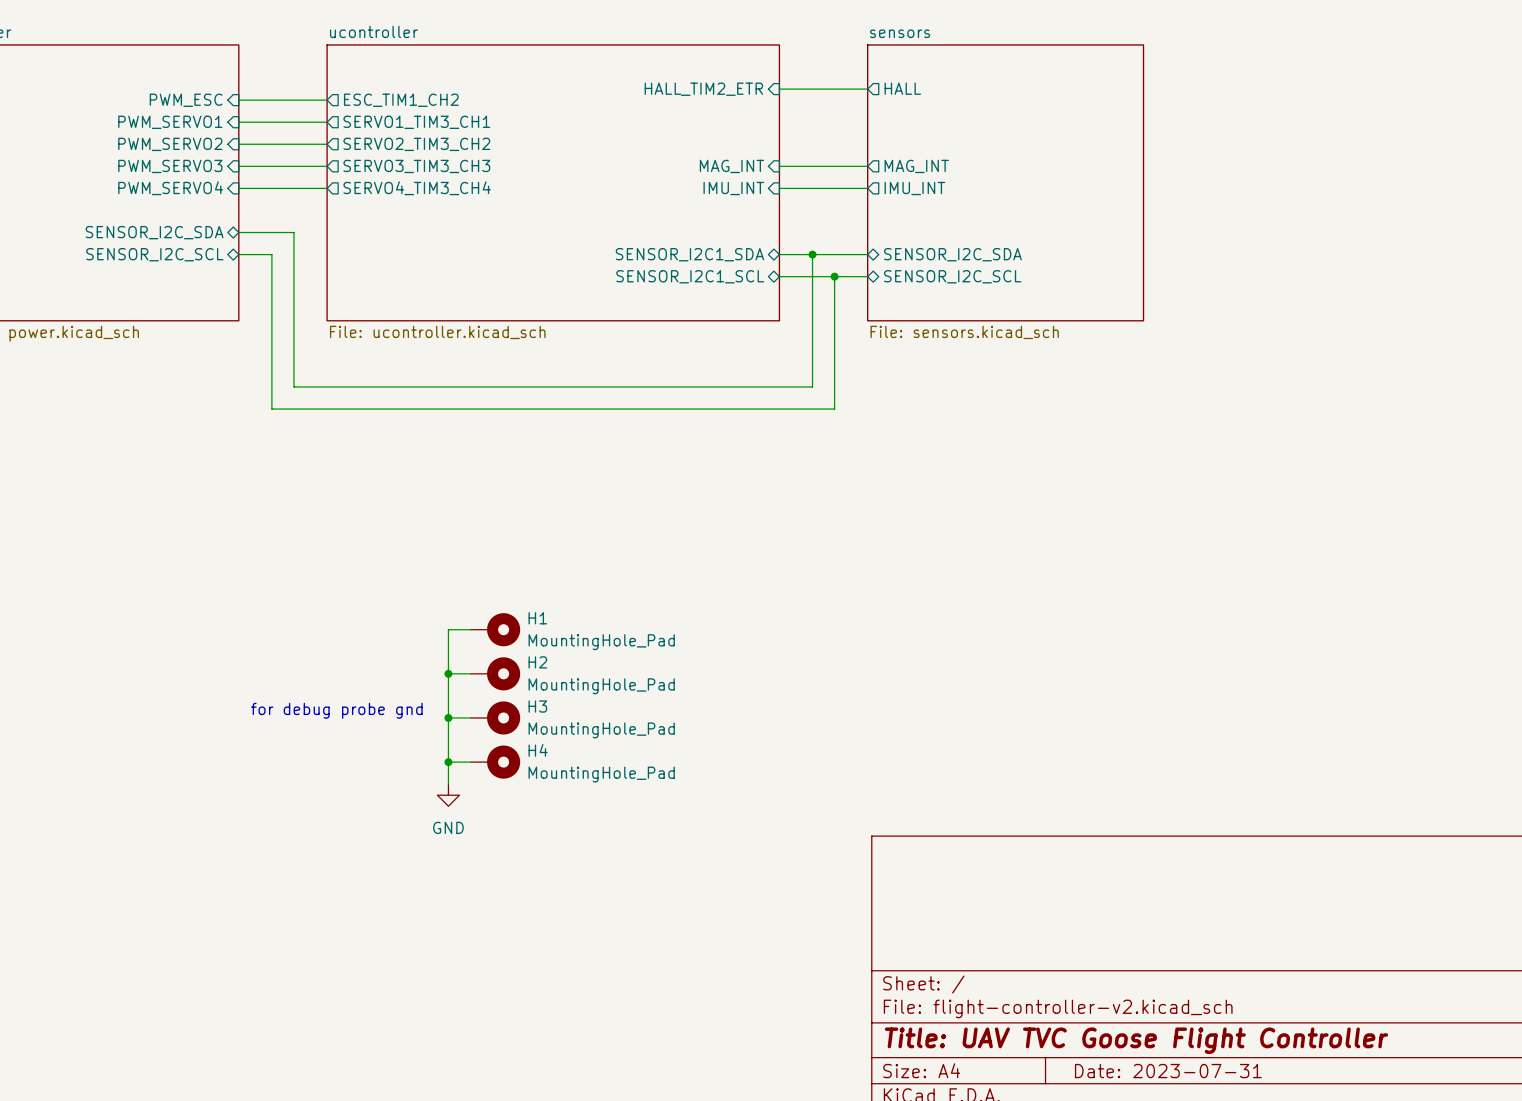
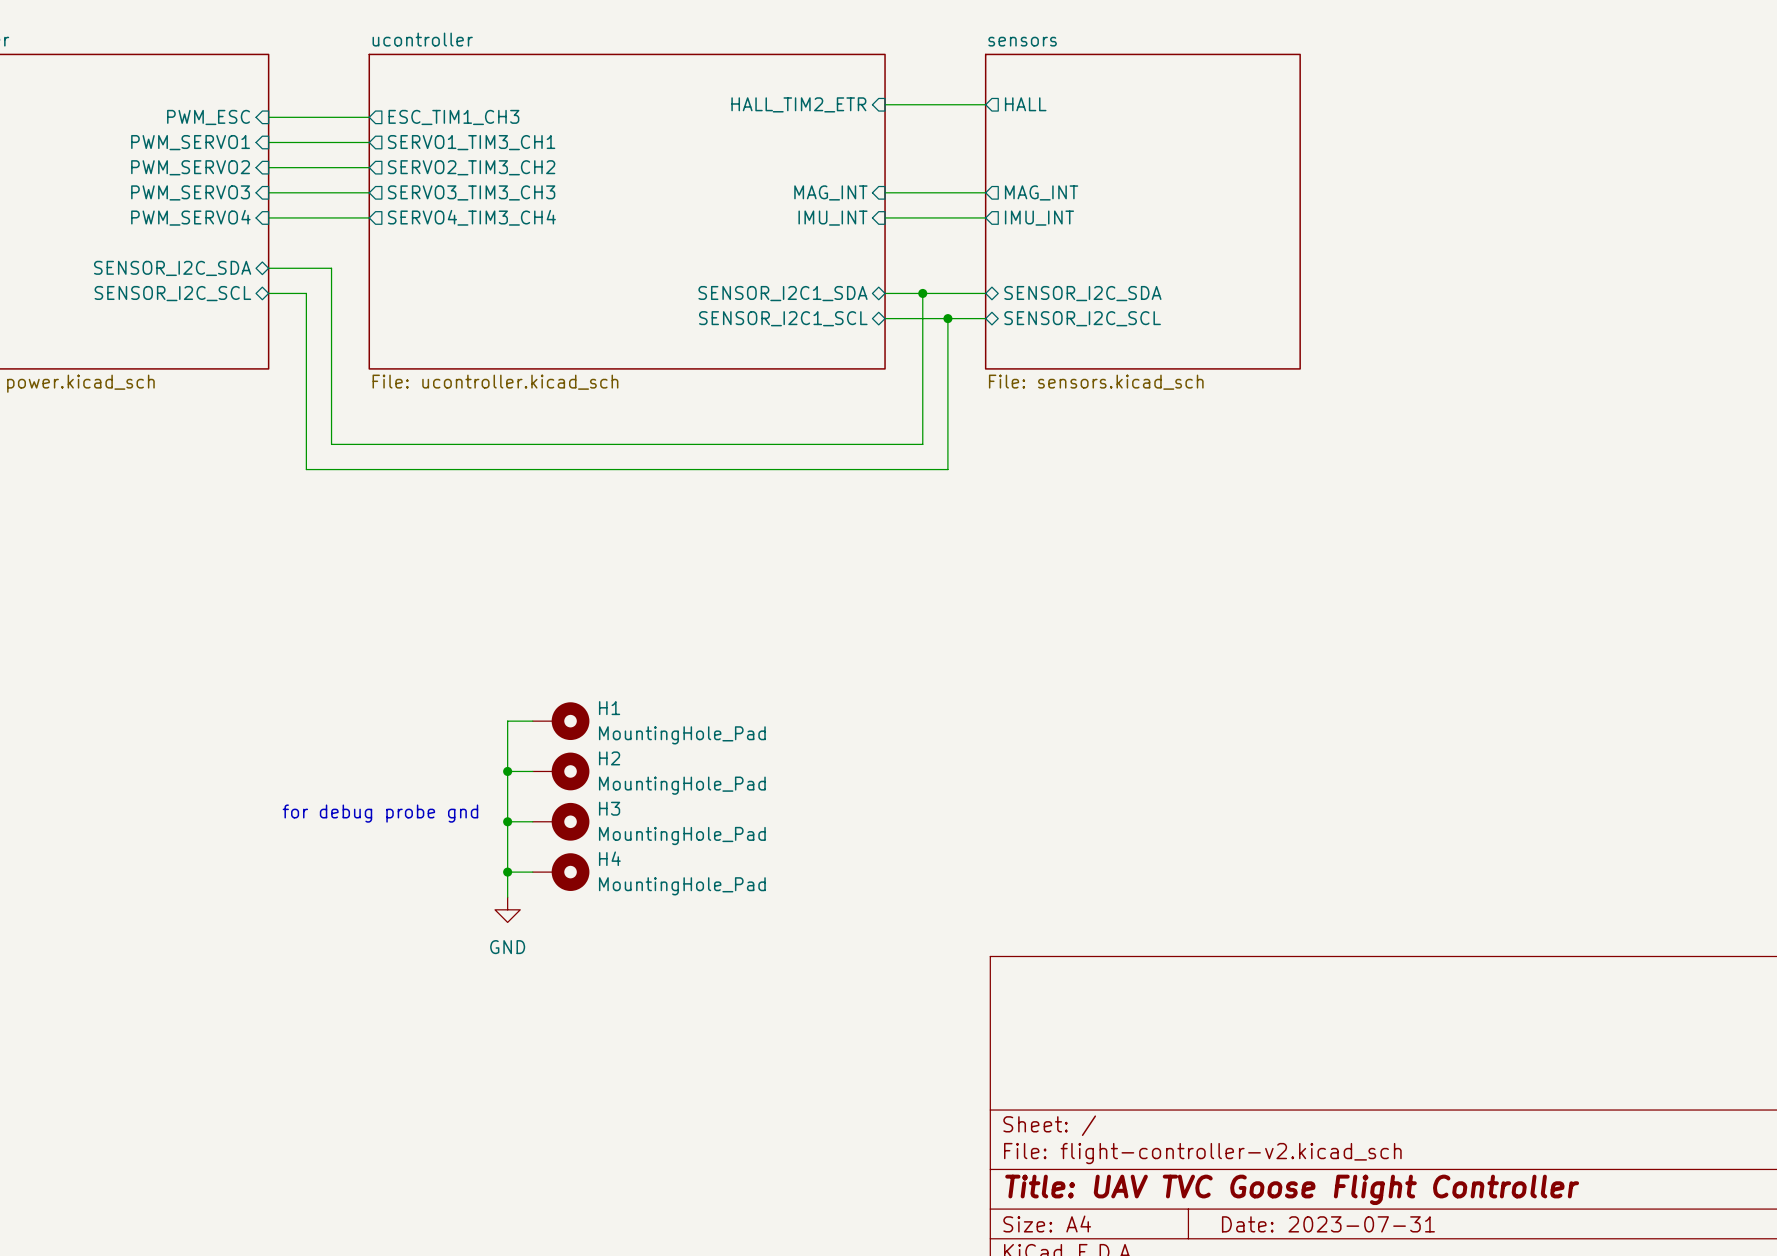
sheet pin: ESC_TIM1_CH2 (401, 100) -> ESC_TIM1_CH3 (453, 117)

